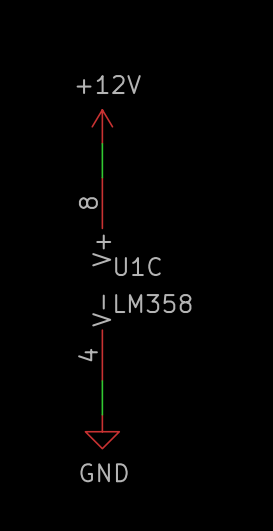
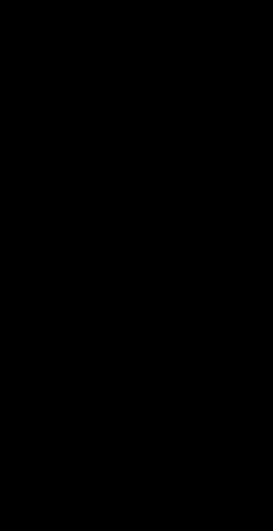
power symbol: +12V (102, 126) -> none
wire: (102, 143) (102, 177) -> none
U1C: LM358 (102, 279) -> none
wire: (102, 380) (102, 414) -> none
power symbol: GND (102, 431) -> none

